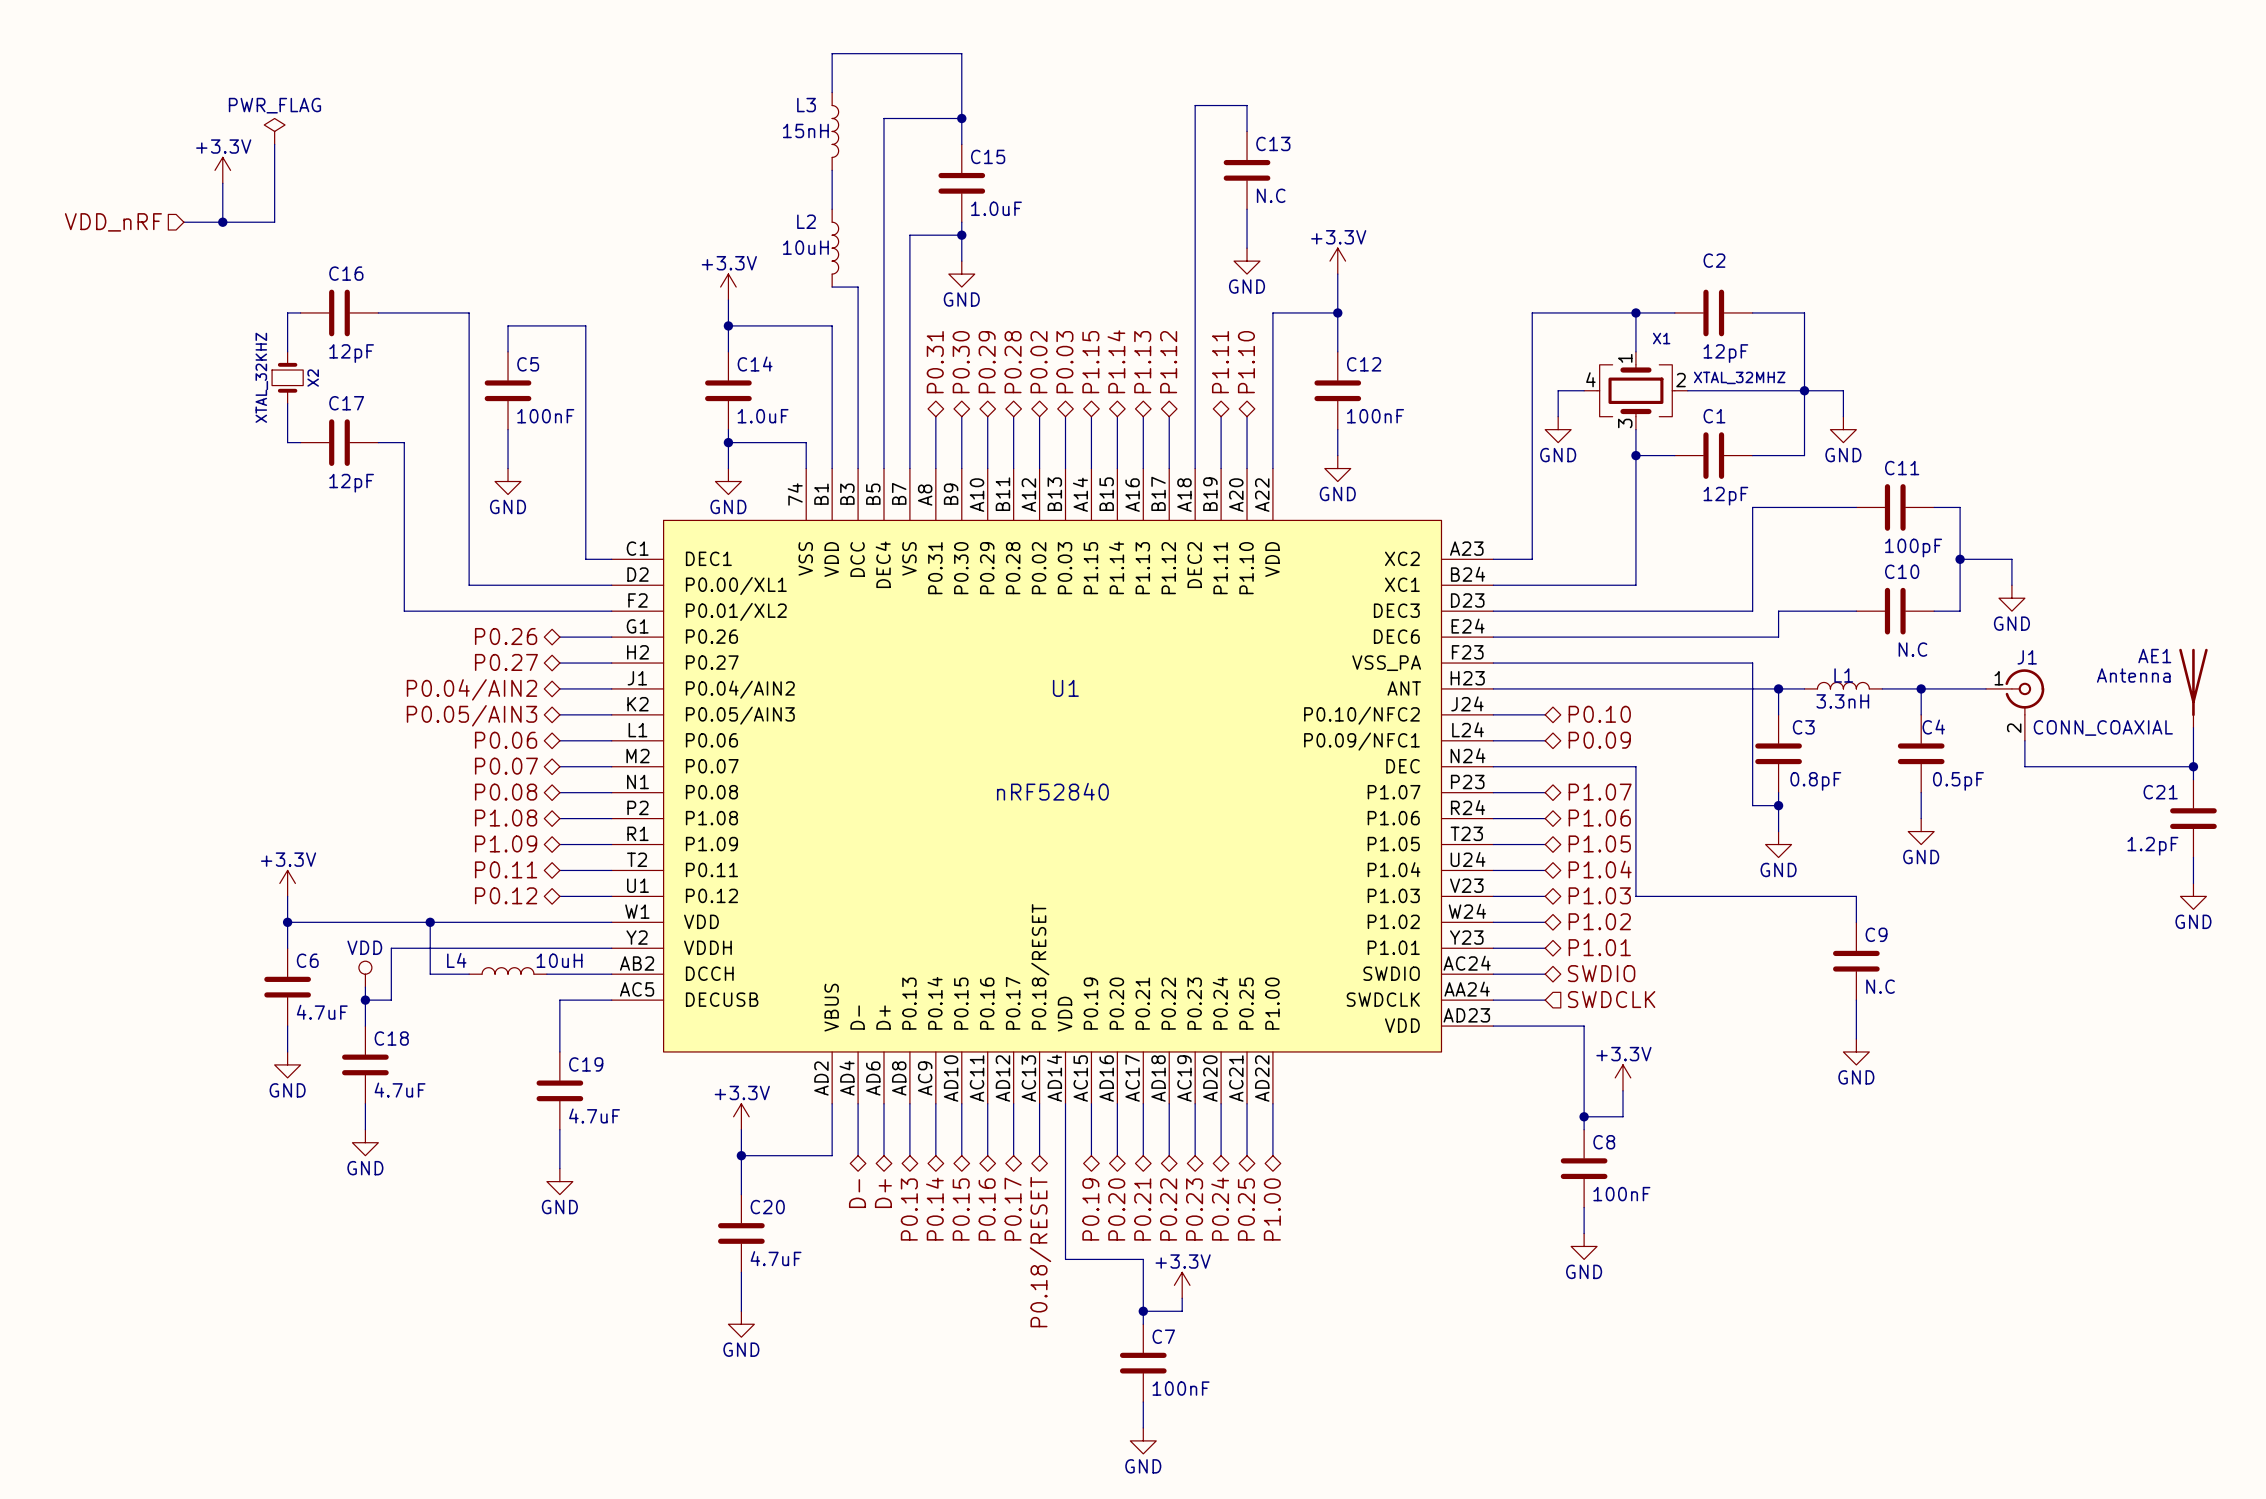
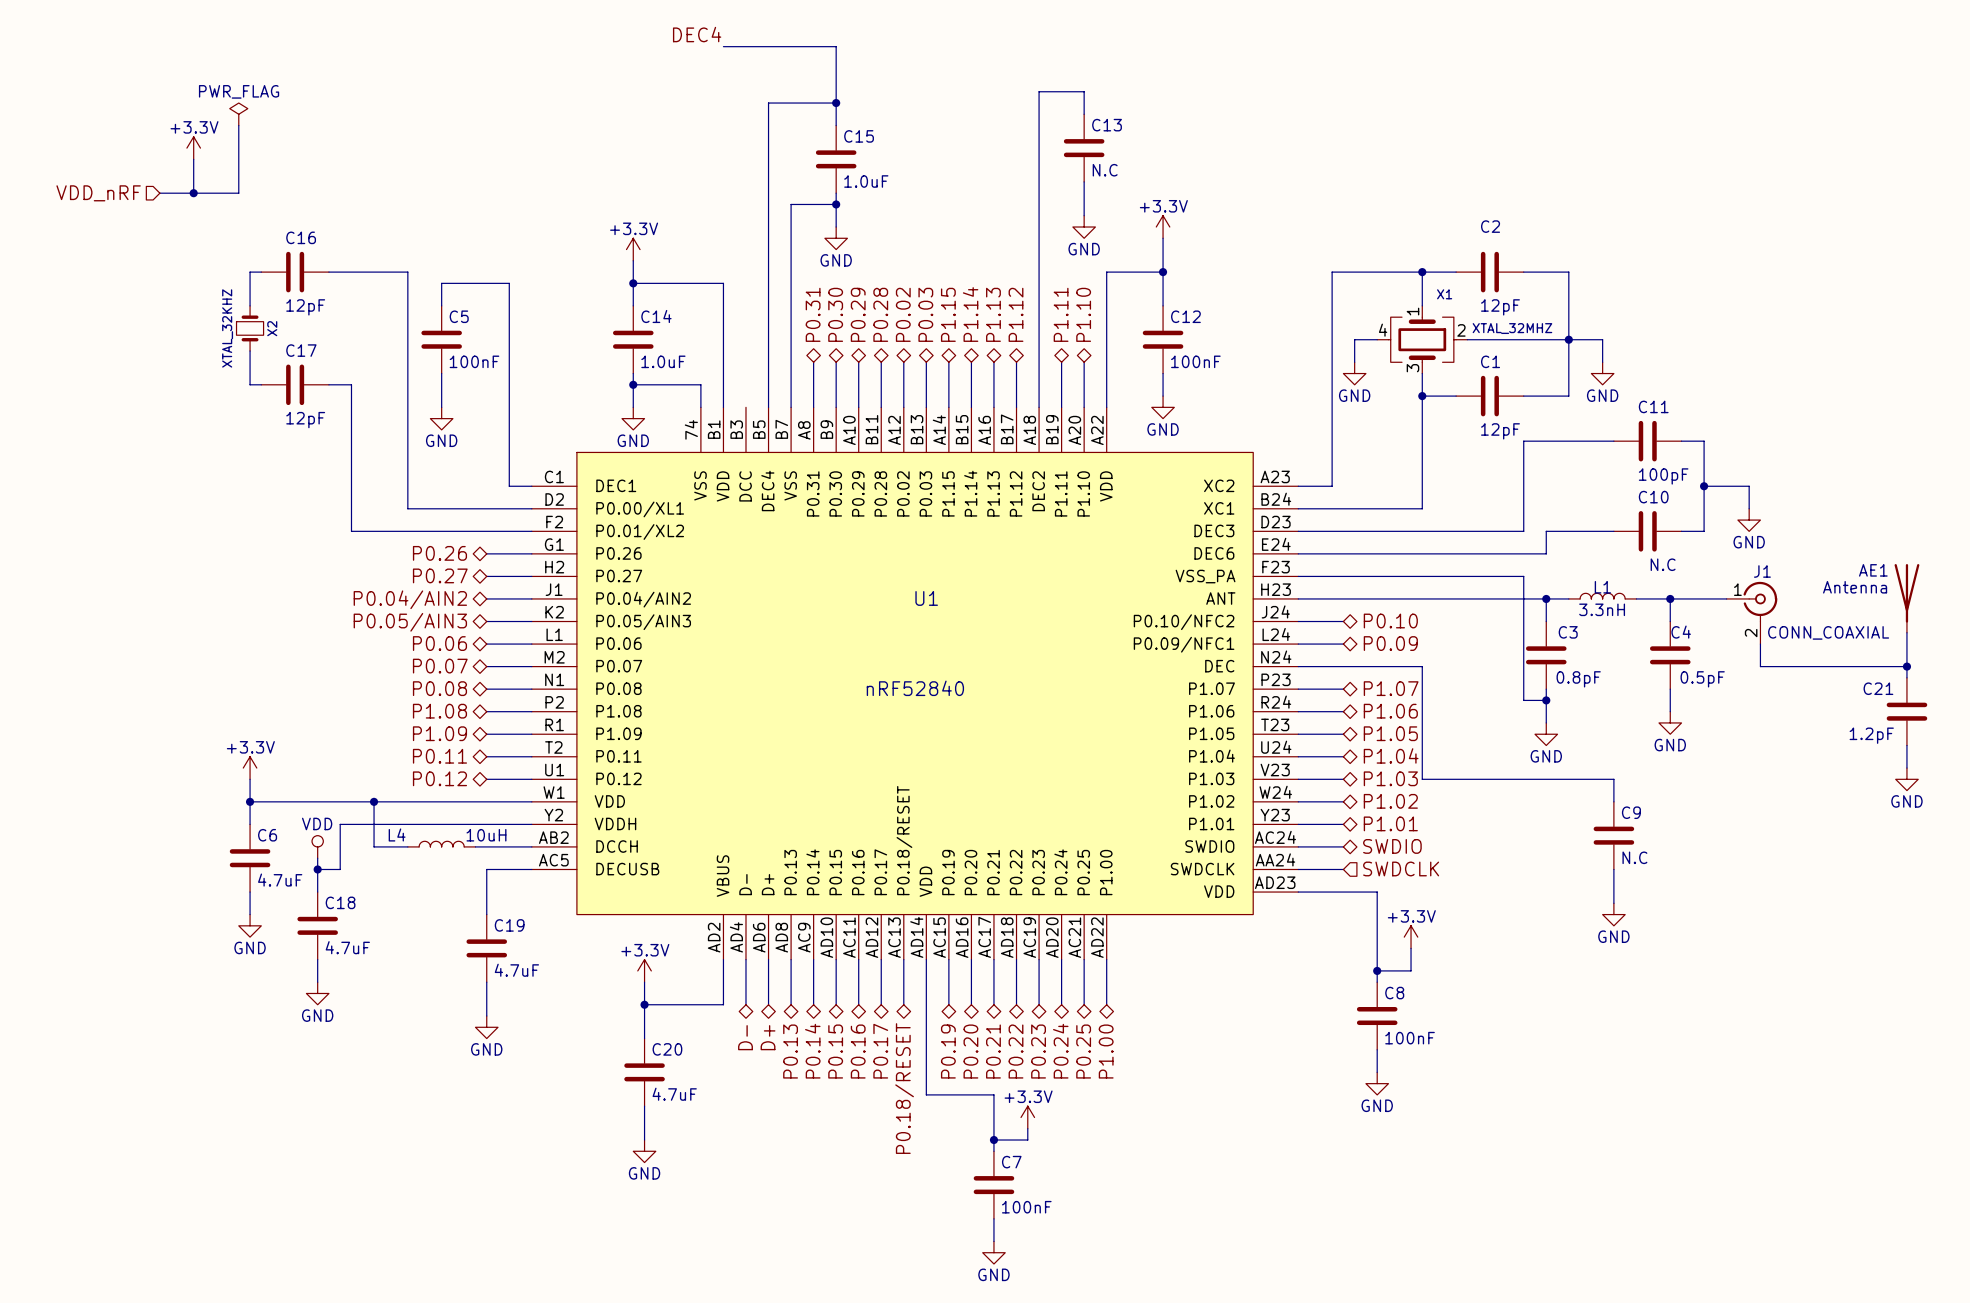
label: none -> DEC4 (697, 34)
wire: (832, 53) (832, 92) -> none
L3: 15nH (835, 131) -> none
wire: (832, 170) (832, 209) -> none
L2: 10uH (835, 248) -> none
wire: (832, 287) (858, 287) (858, 468) -> none

